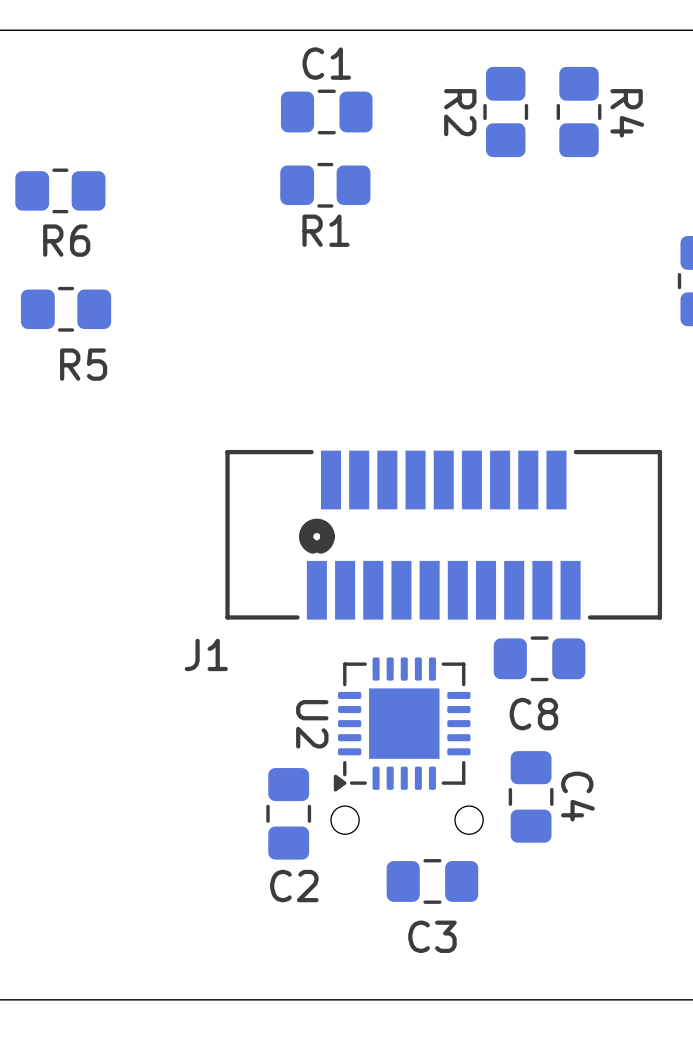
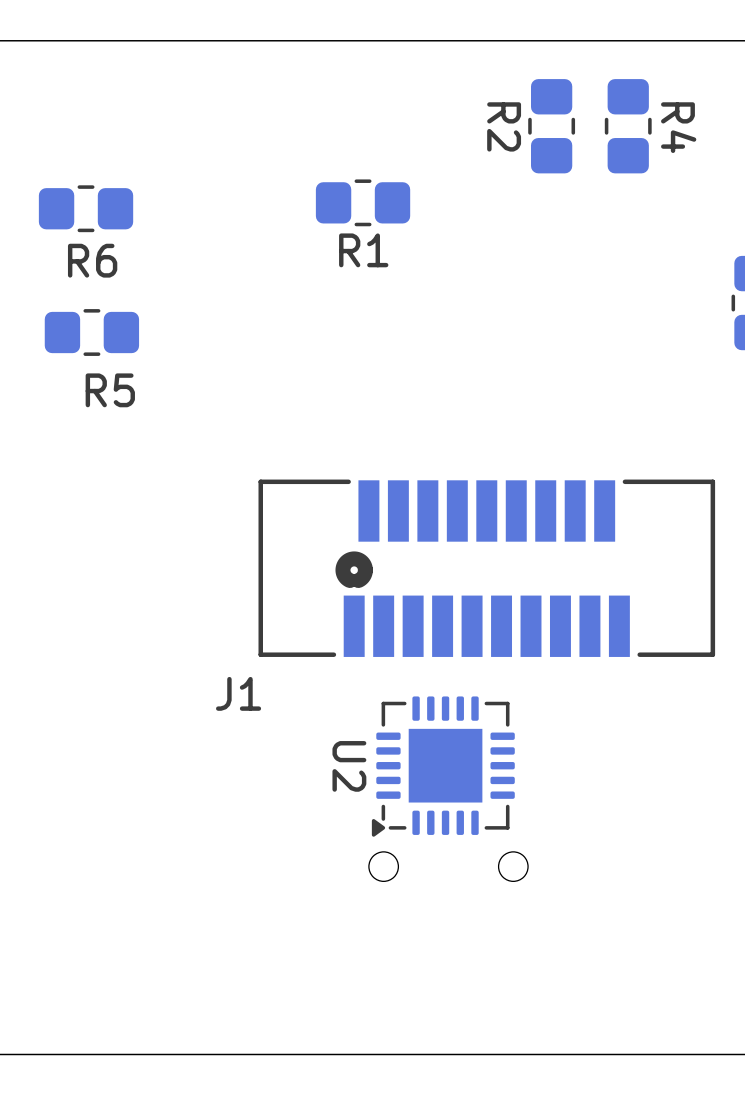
C1: (326, 111) -> none
C8: (539, 658) -> none
C4: (531, 796) -> none
C2: (288, 813) -> none
C3: (432, 881) -> none

